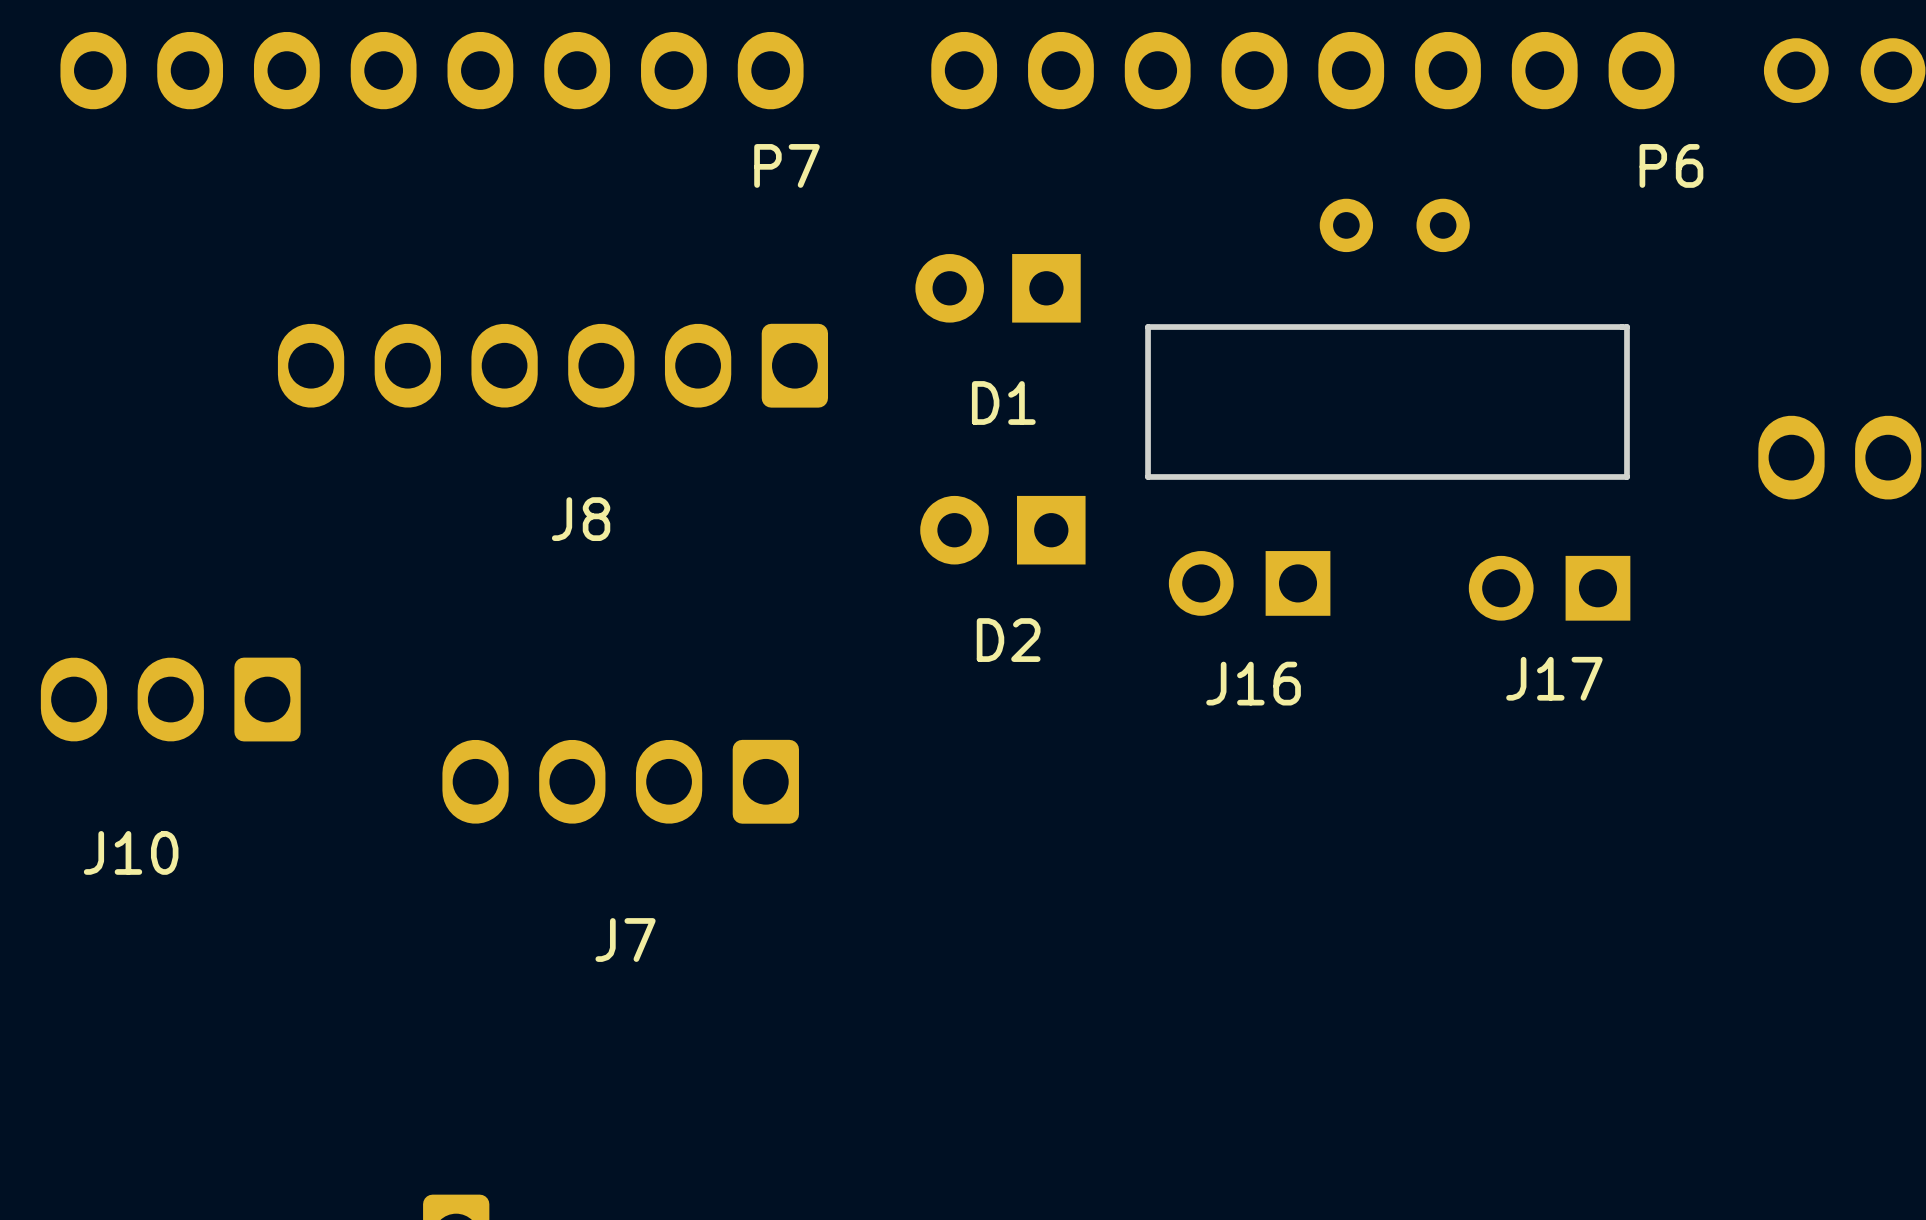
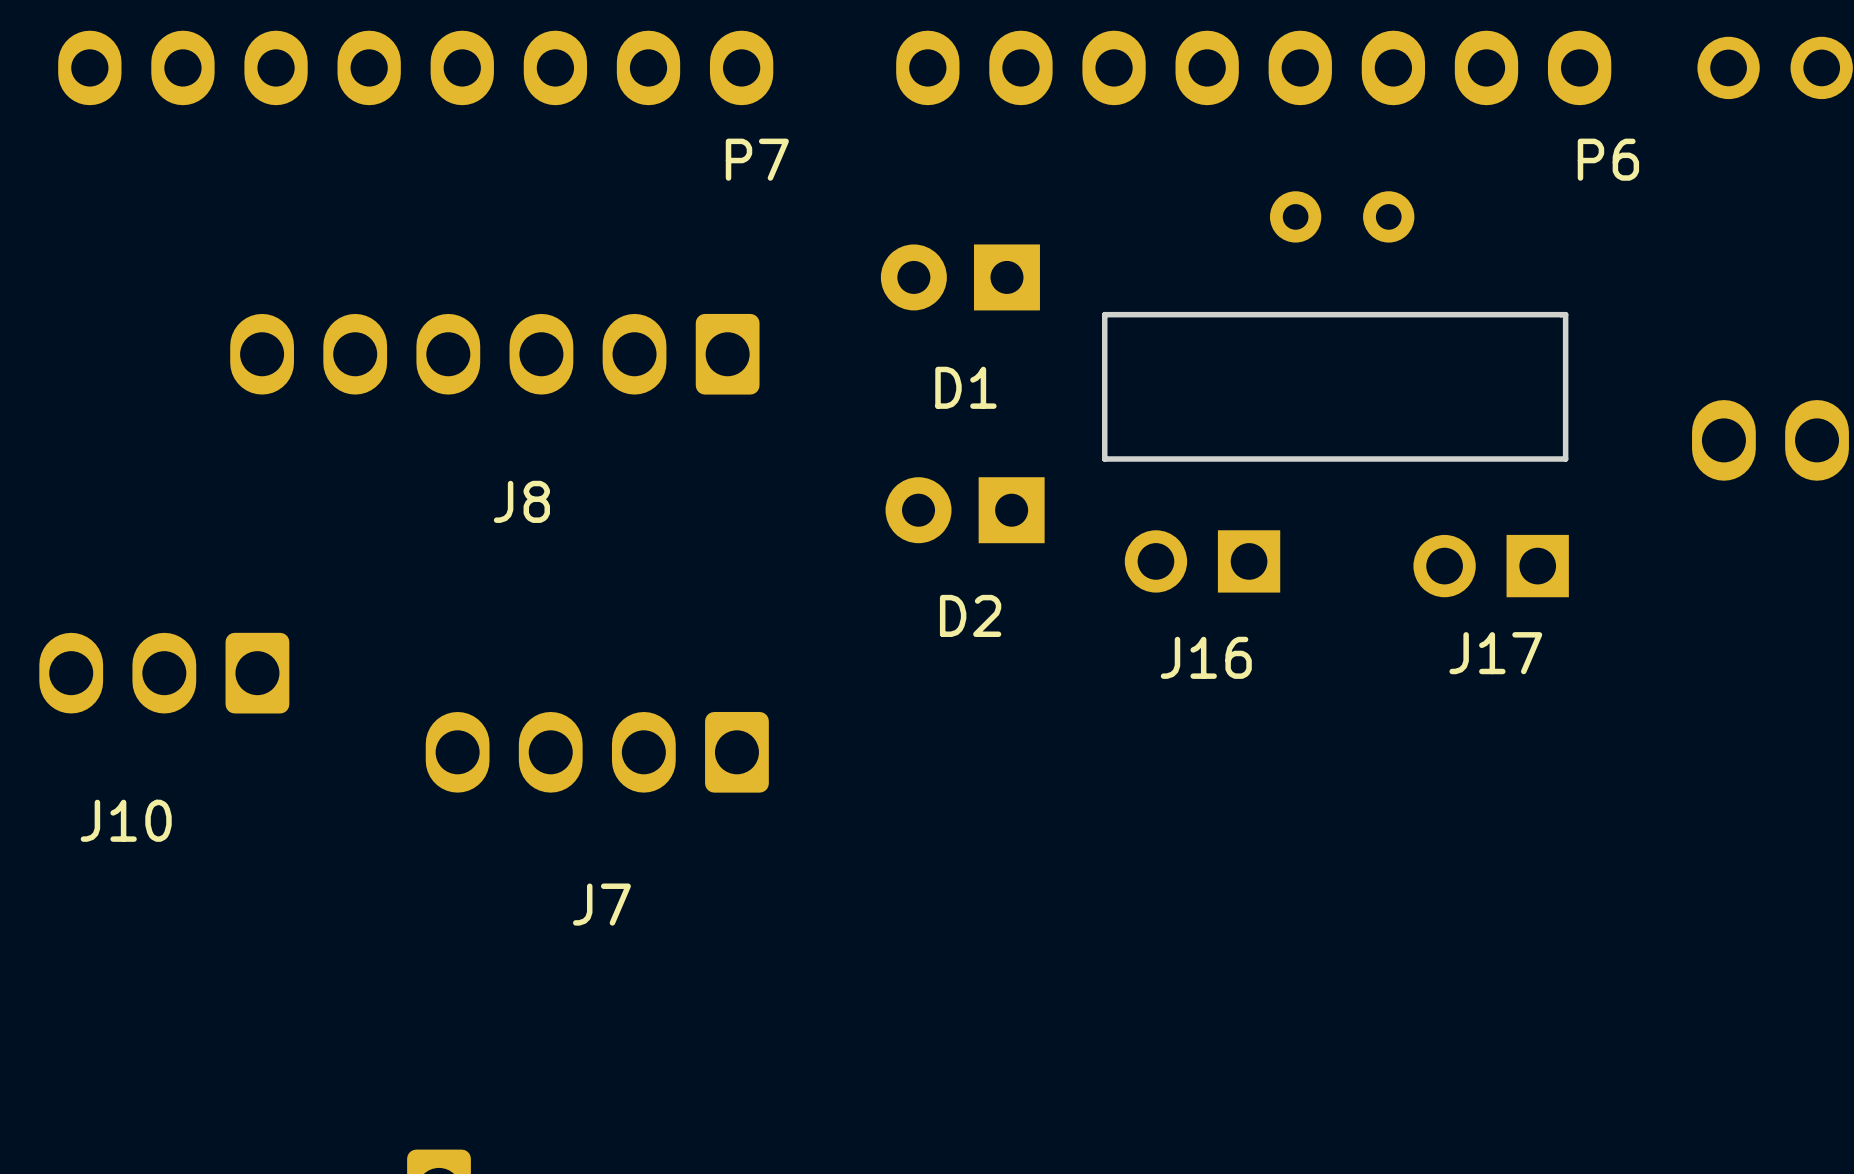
J8 position: (552, 365) -> (494, 354)

